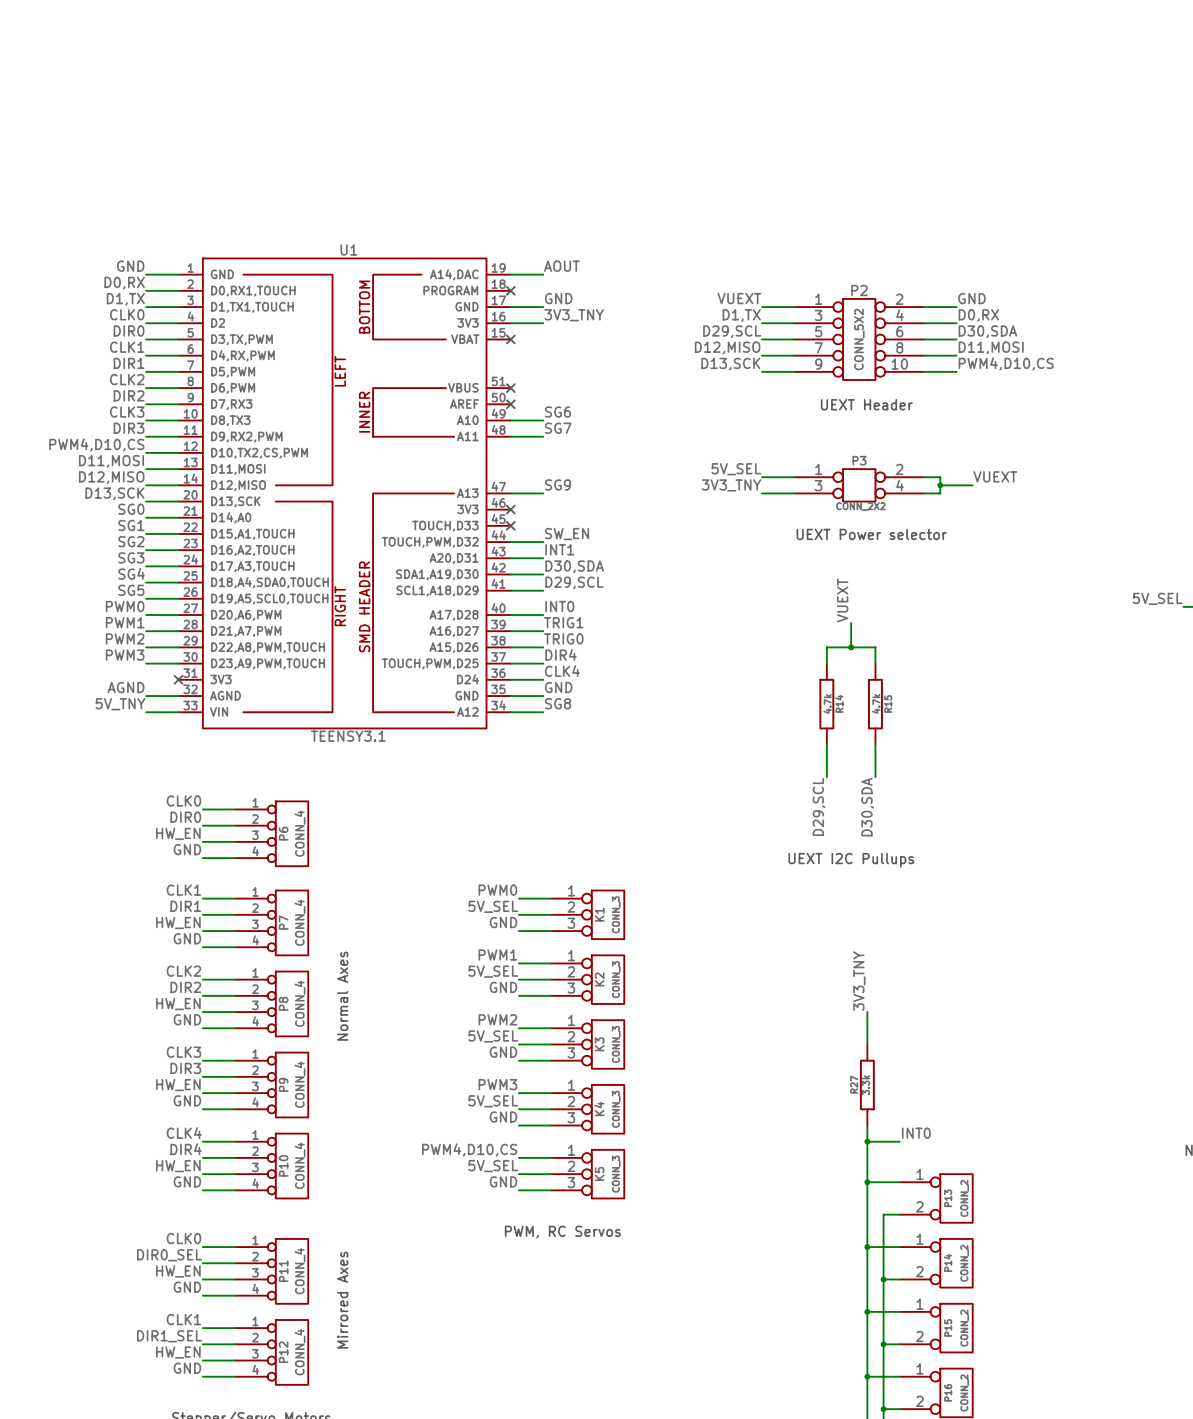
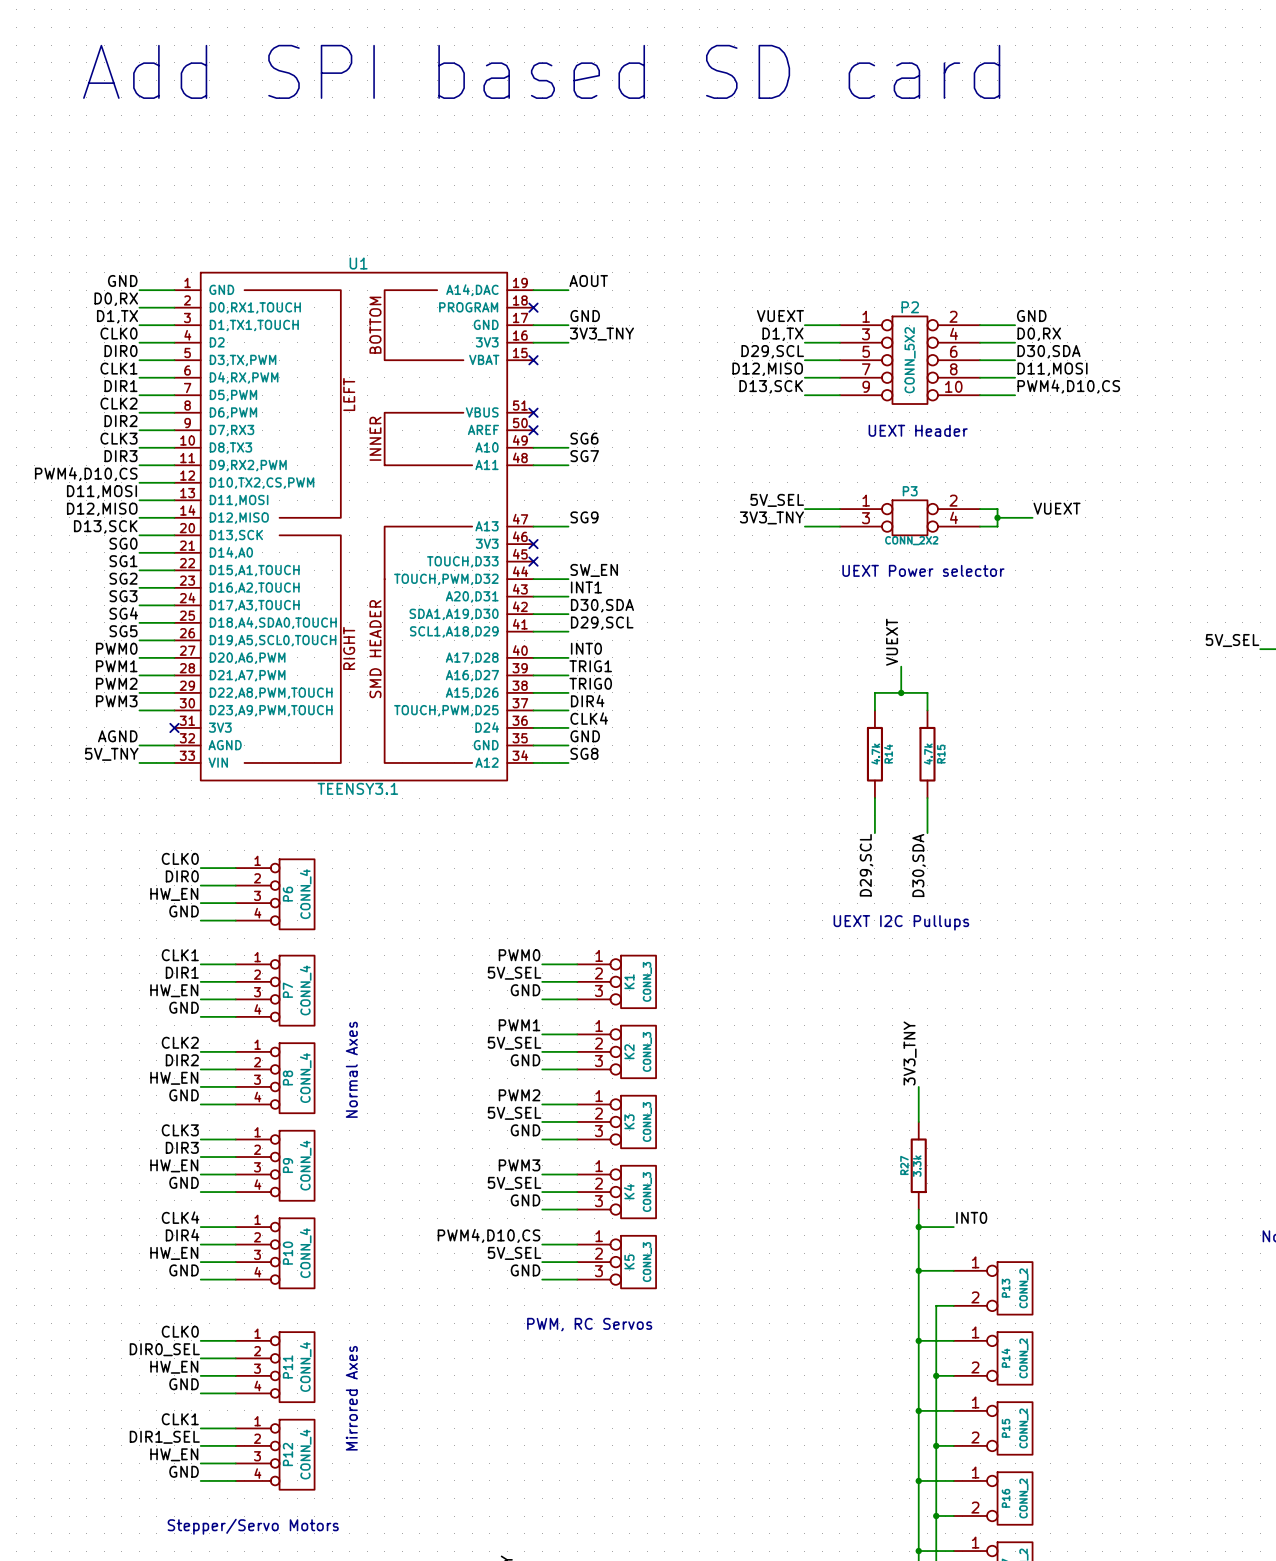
text: none -> Add SPI based SD card (541, 71)

